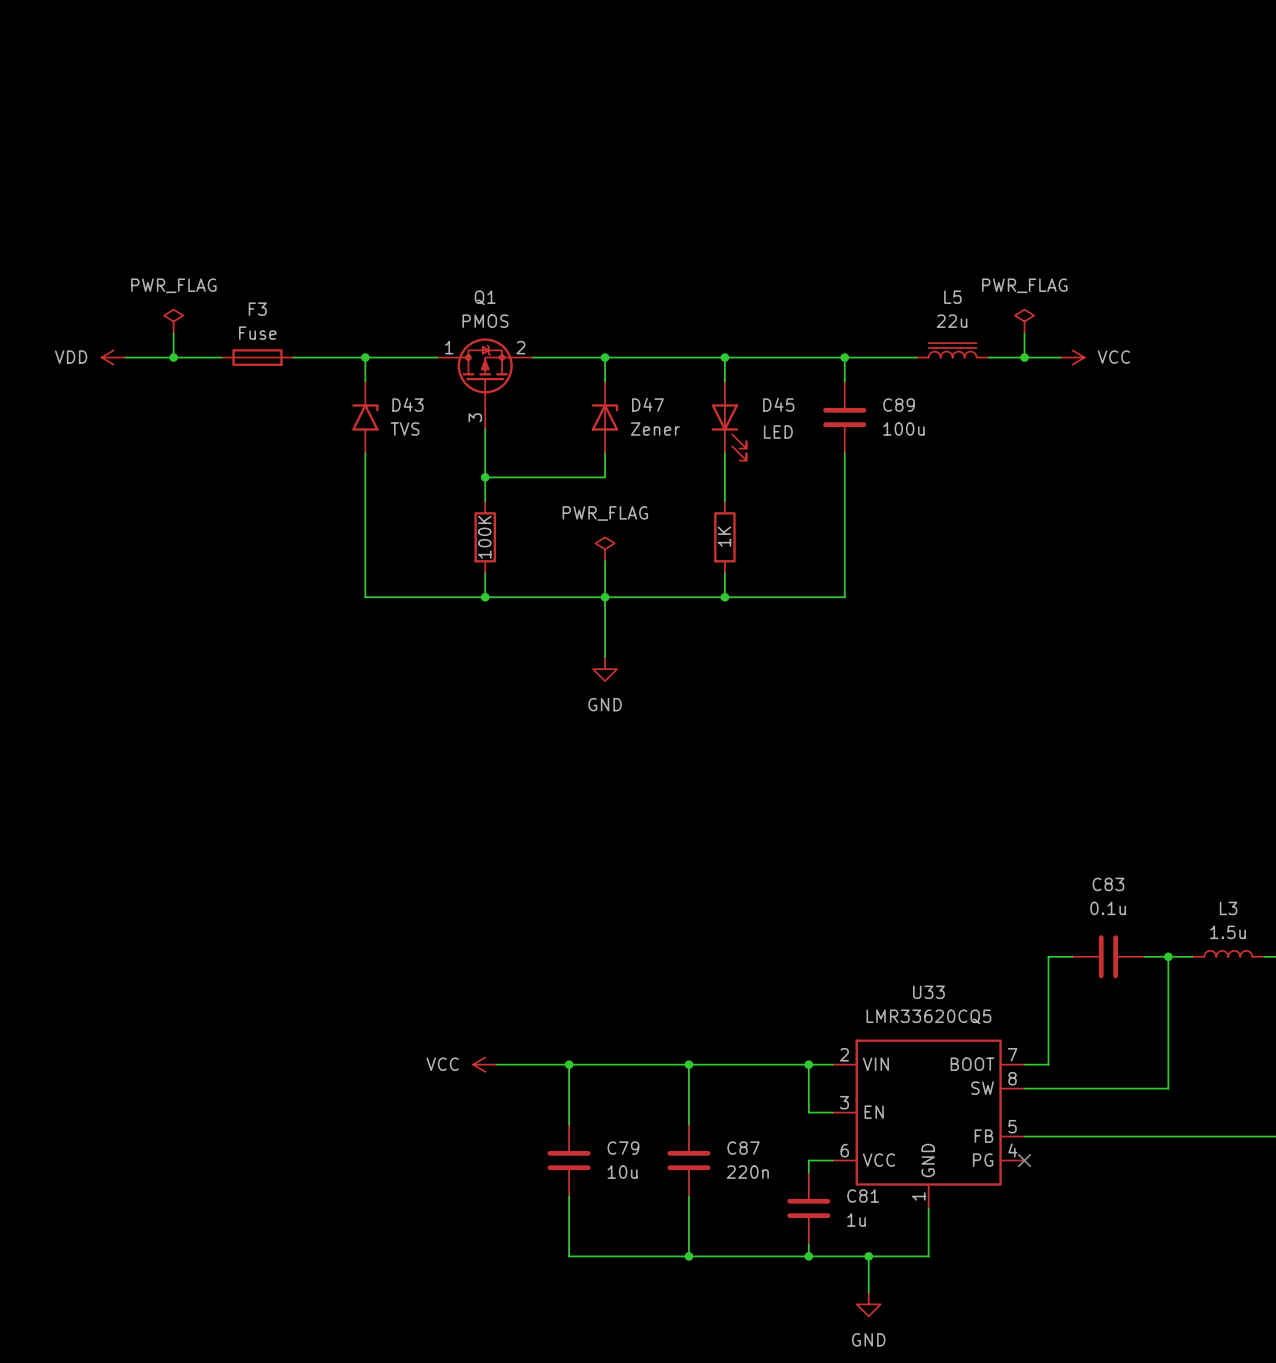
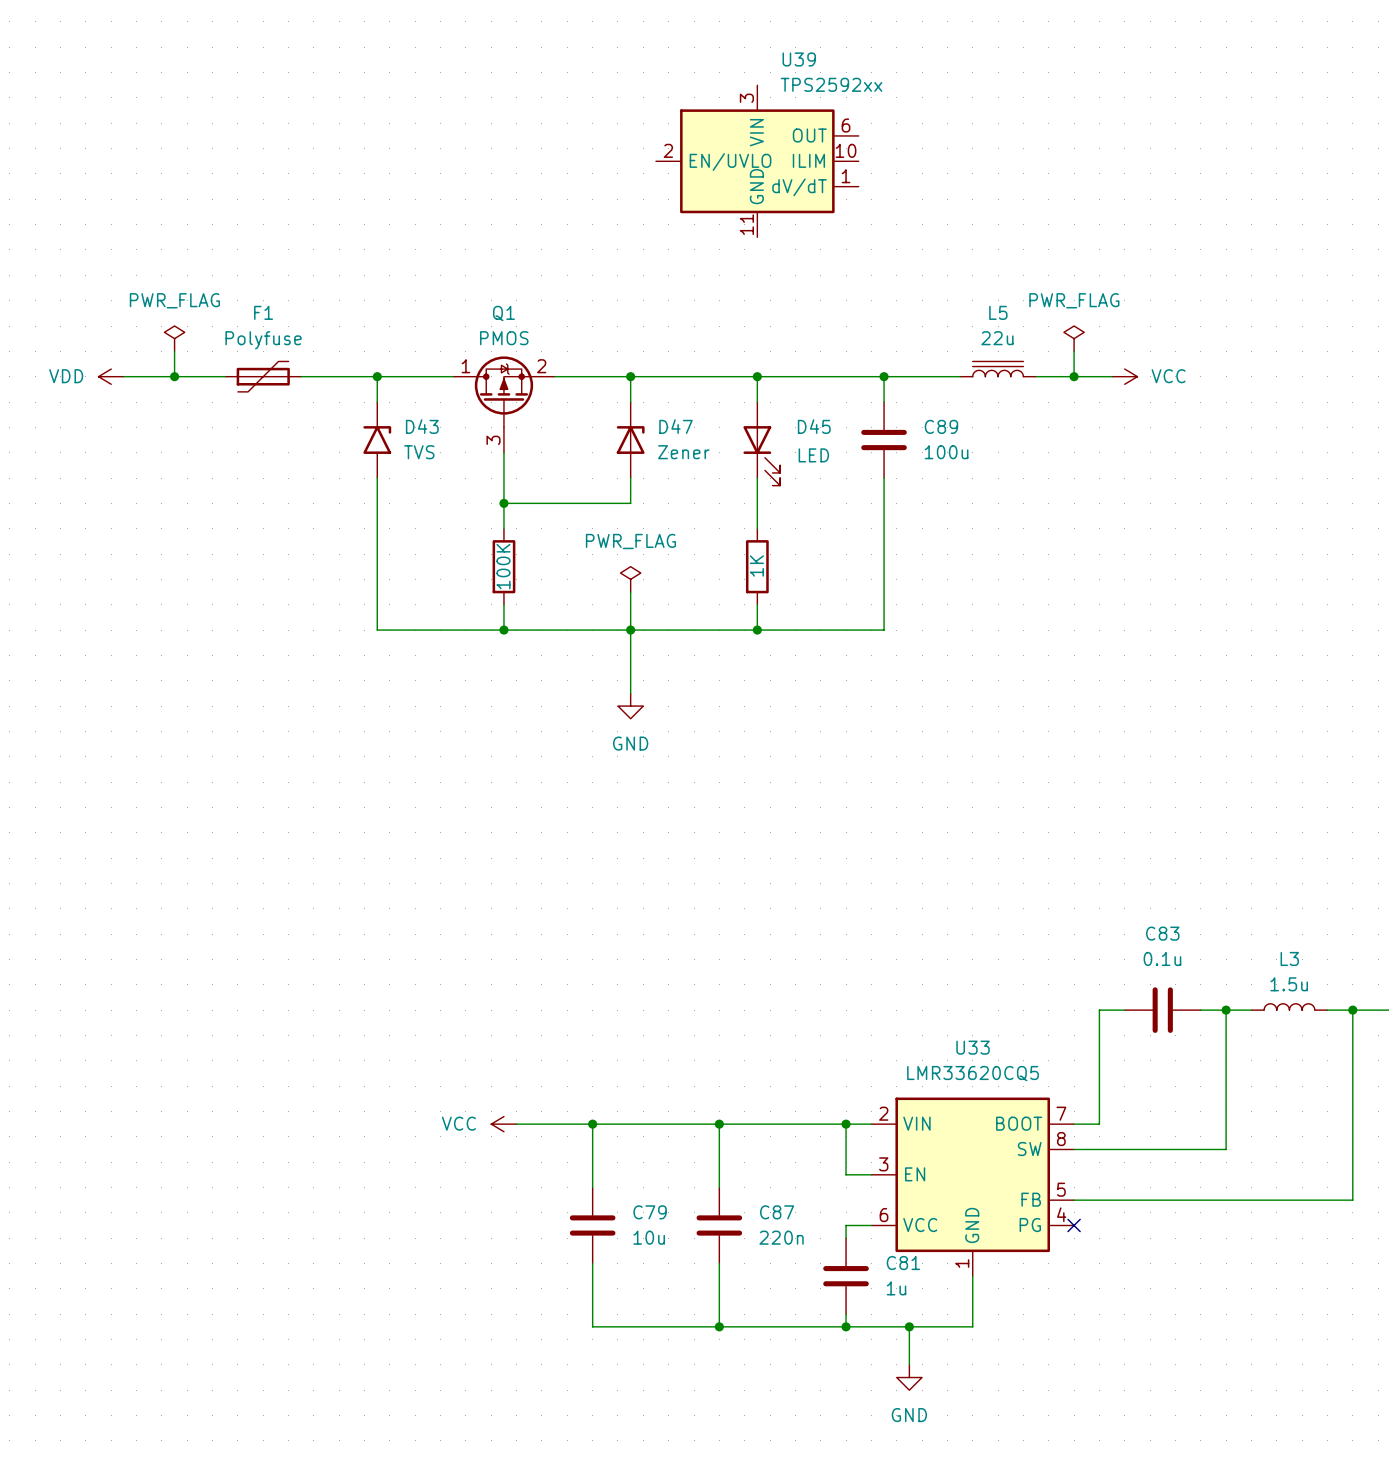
U39: none -> TPS2592xx (757, 161)
F3: Fuse (257, 357) -> none
F1: none -> Polyfuse (263, 376)

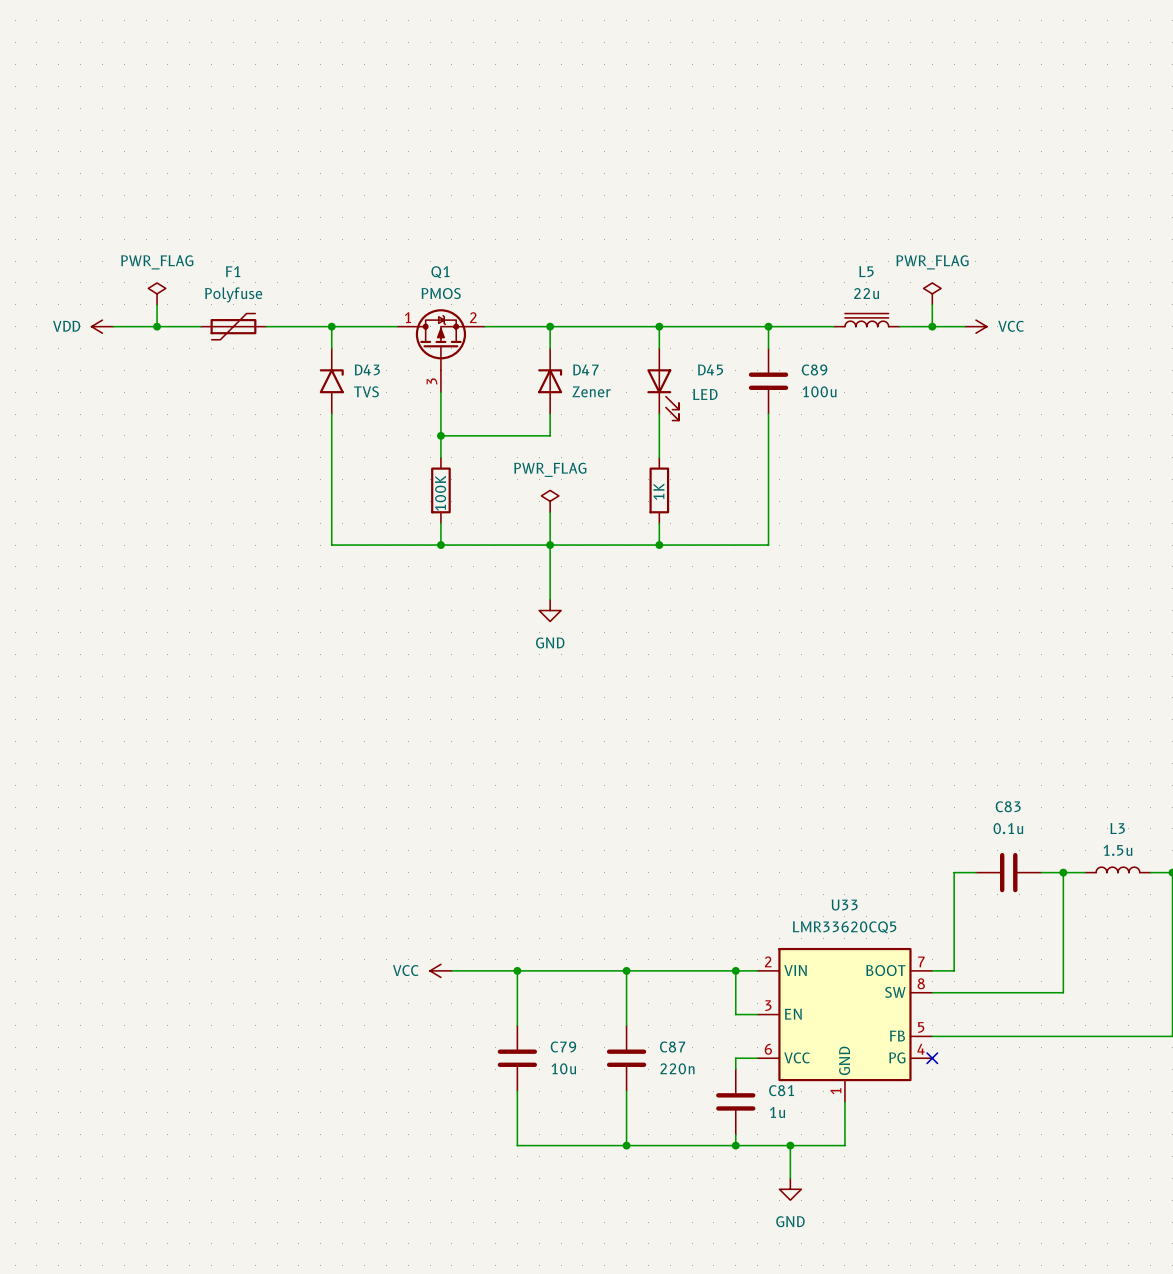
U39: TPS2592xx (757, 161) -> none

